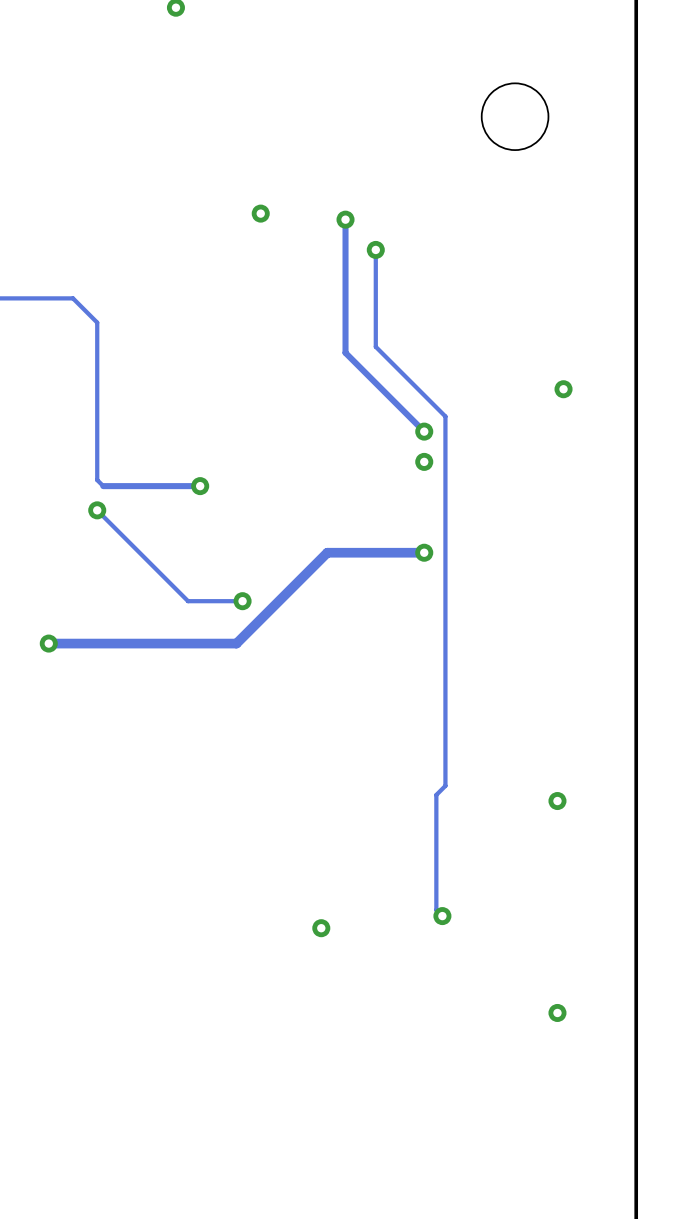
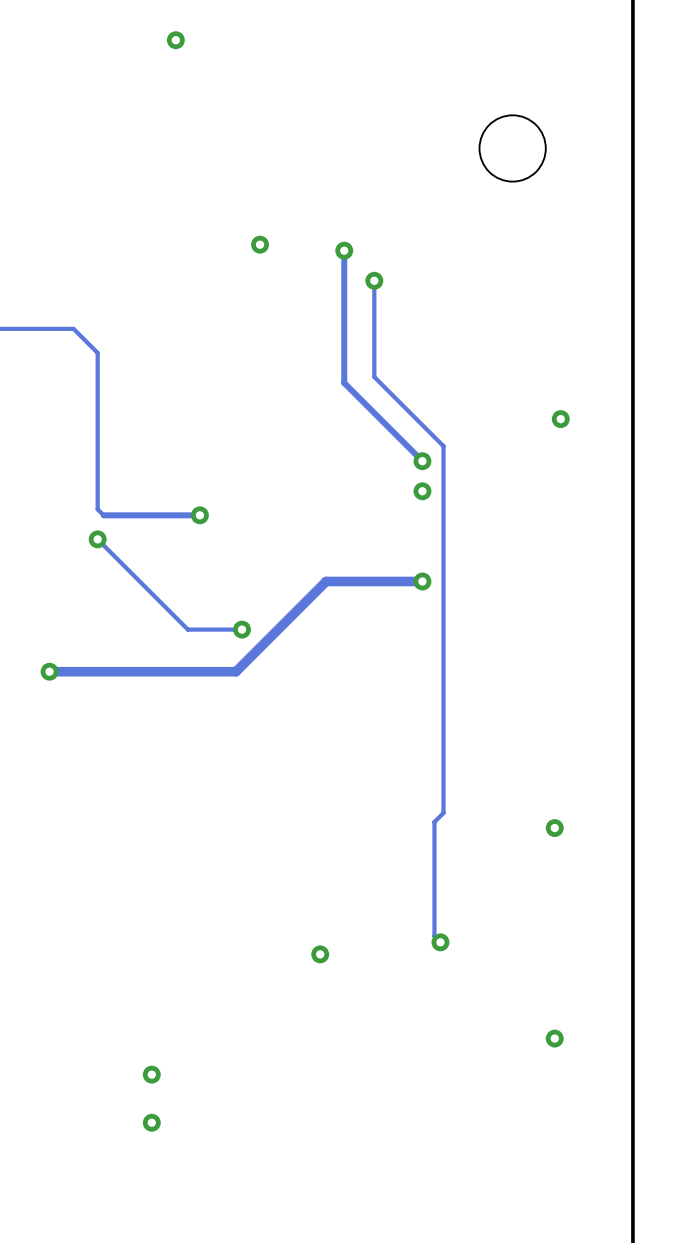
via: none -> (151, 1074)
via: none -> (151, 1122)

